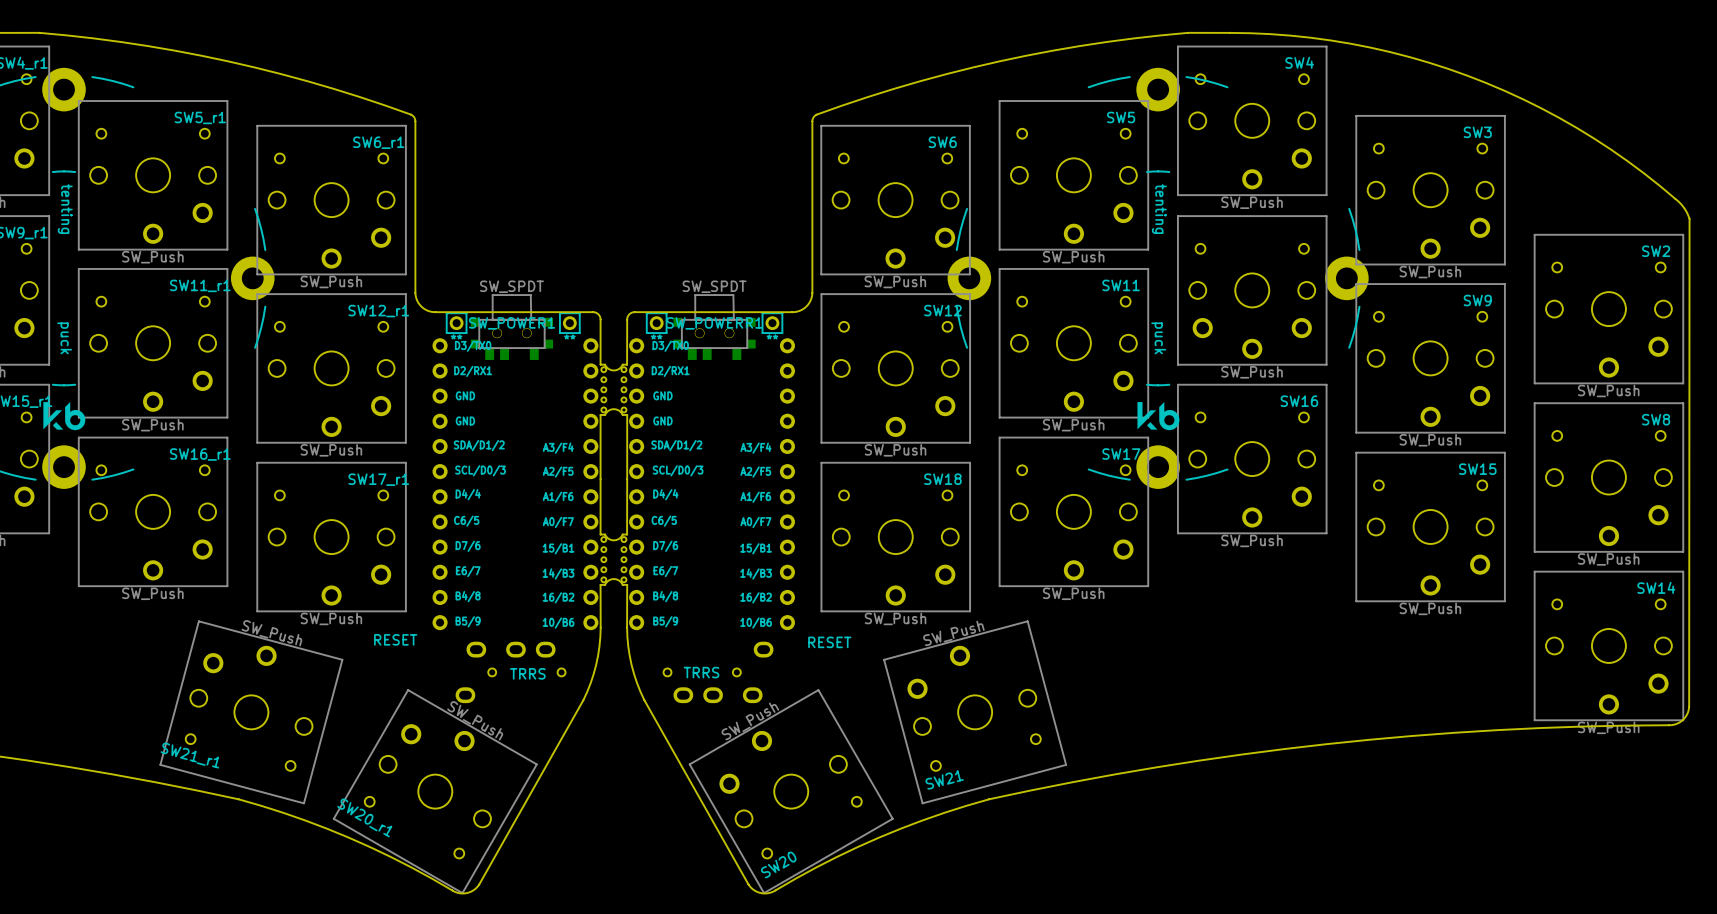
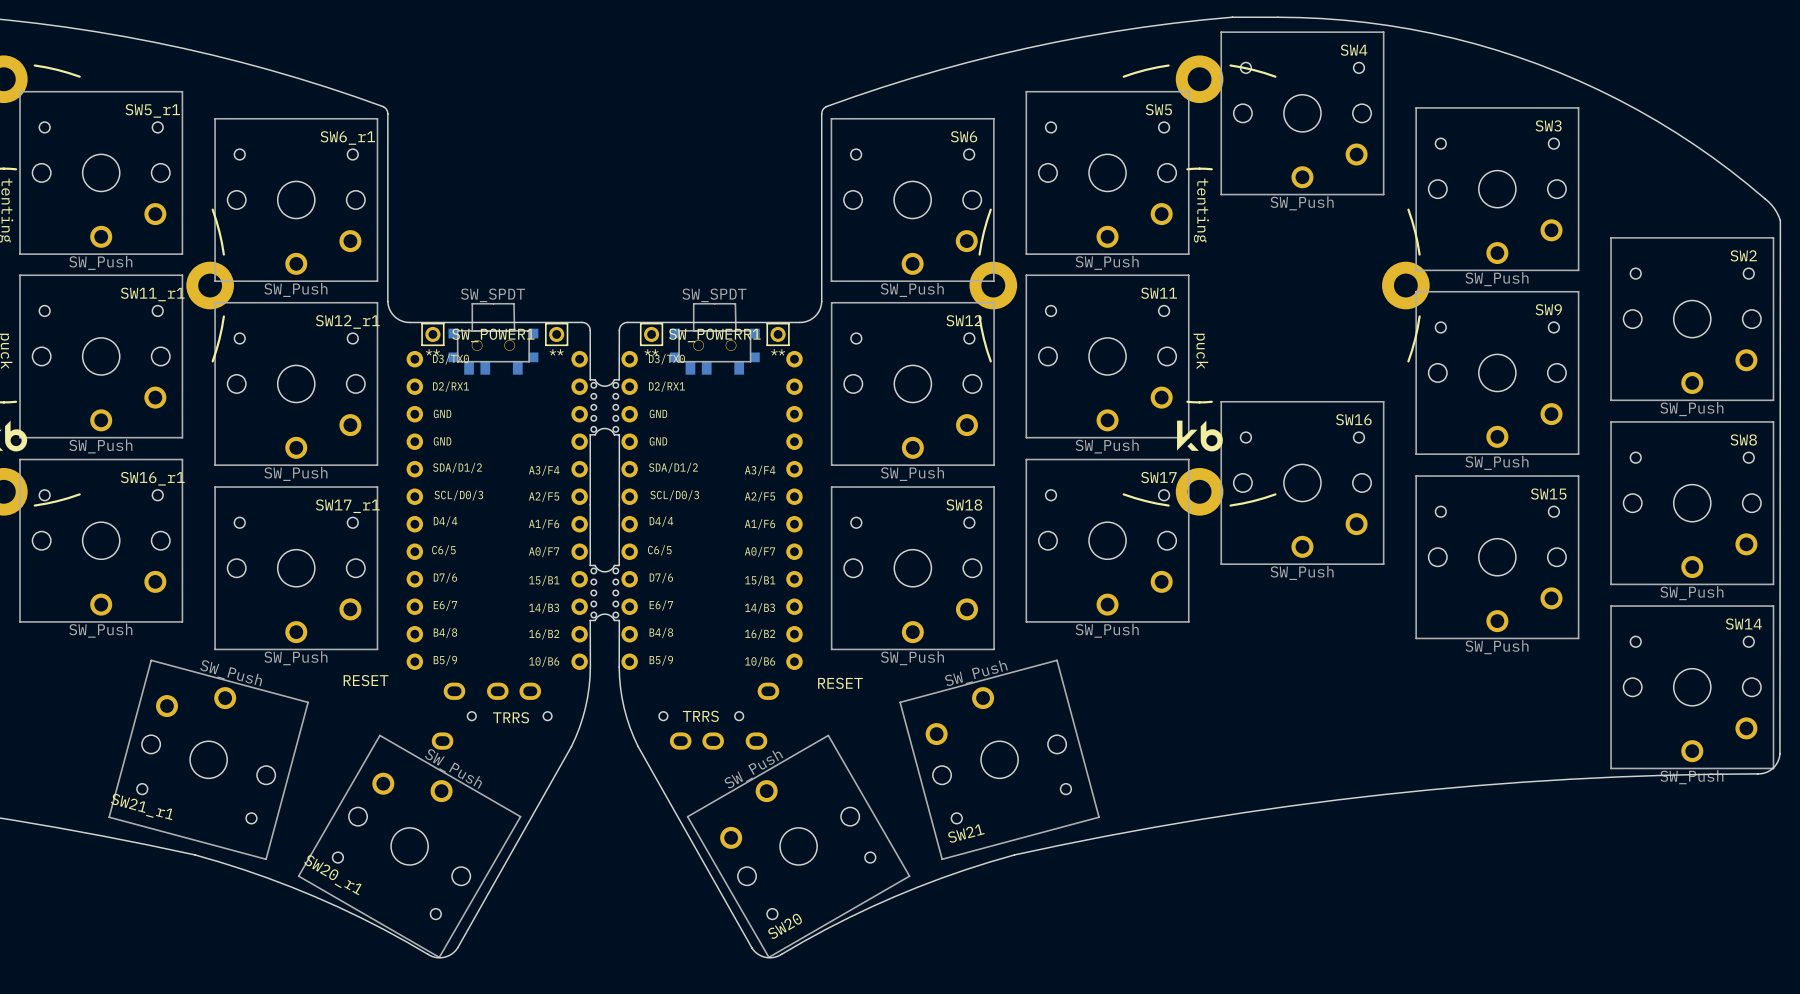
part: SW_Push (1252, 290) -> none

